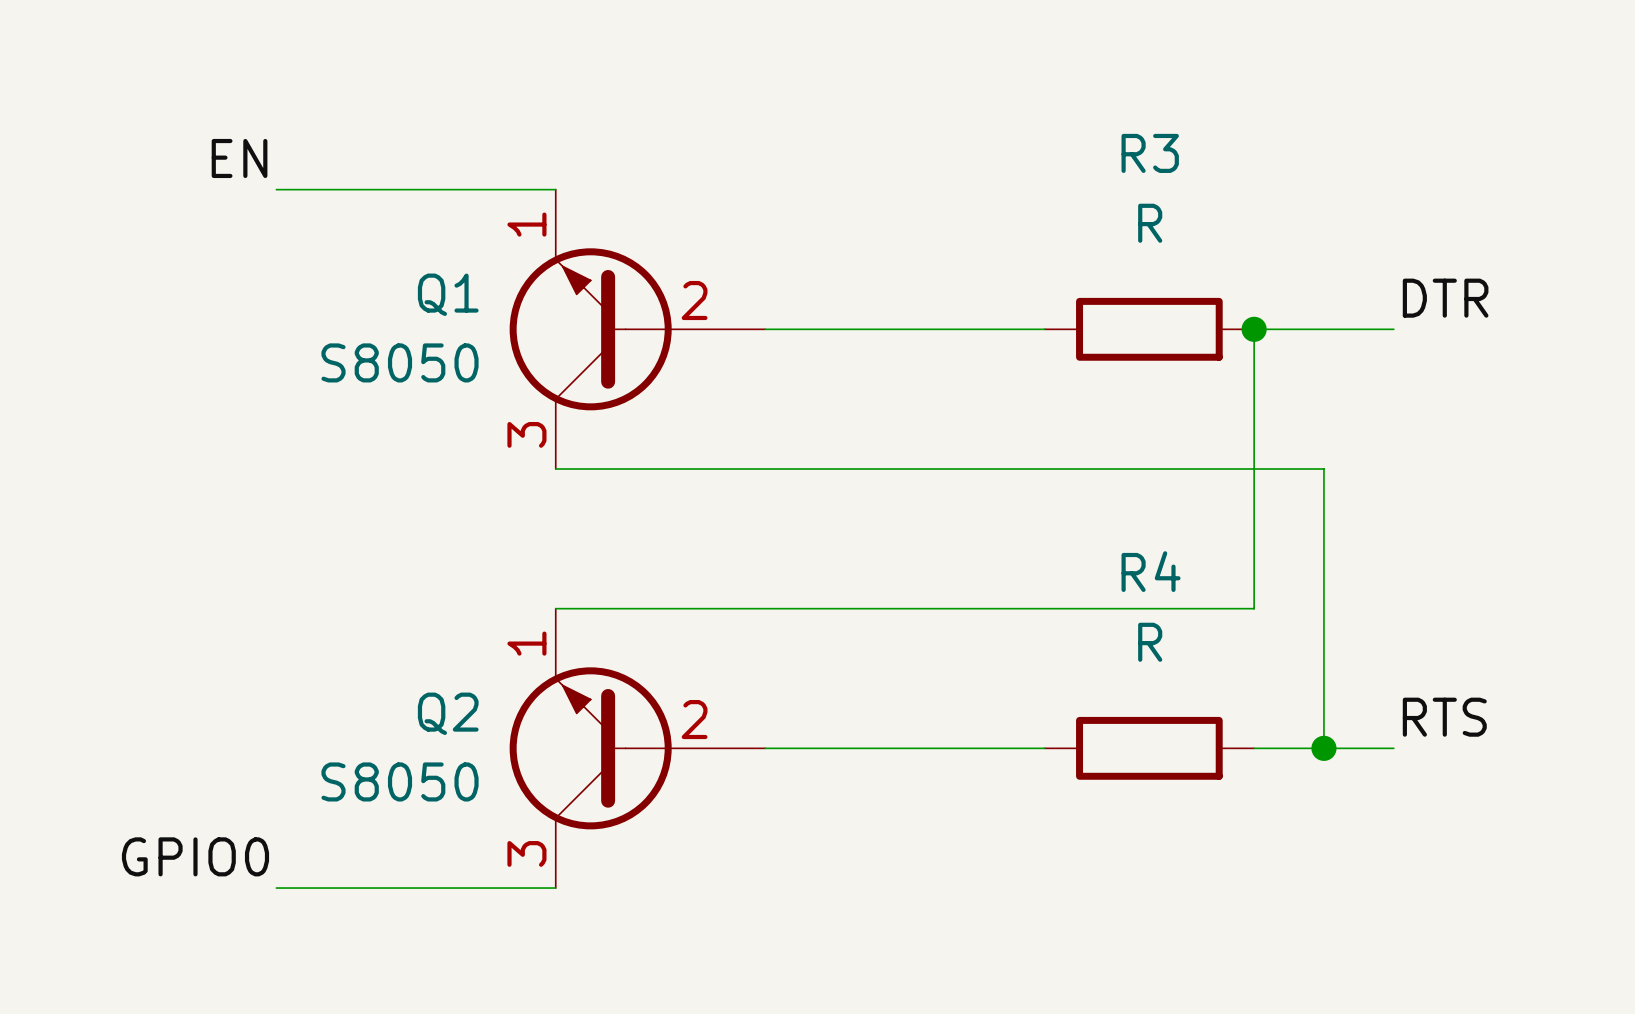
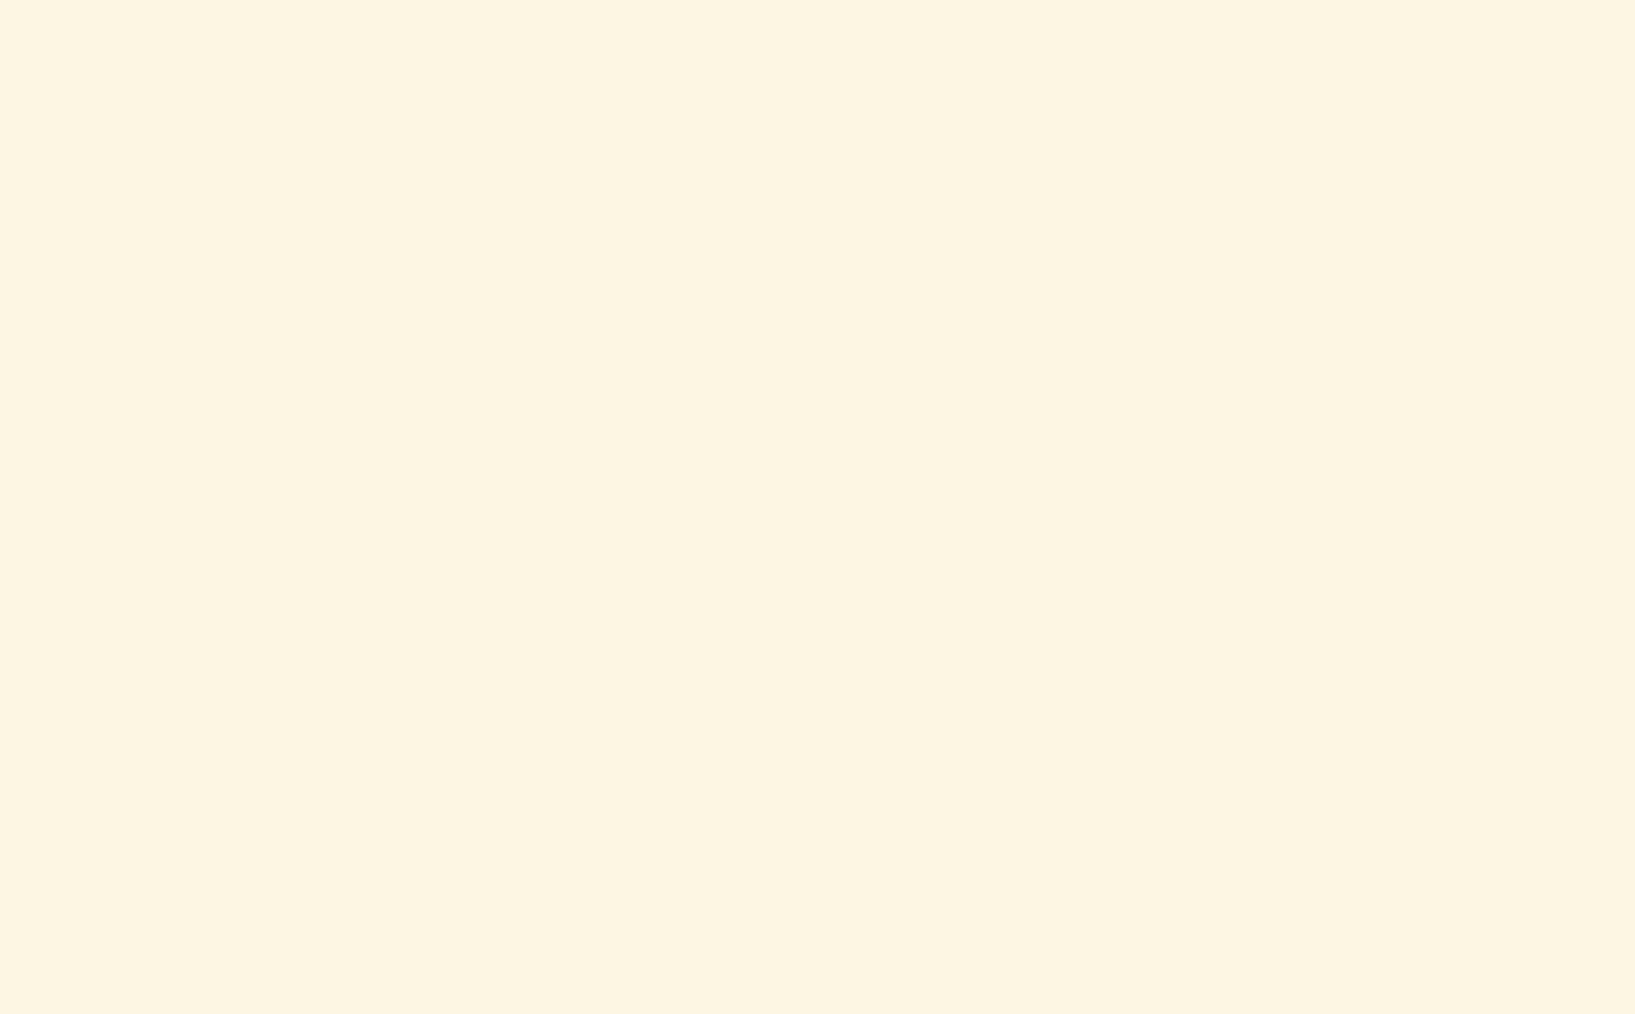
label: EN (239, 158) -> none
wire: (276, 189) (555, 189) -> none
label: DTR (1445, 298) -> none
Q1: S8050 (637, 329) -> none
wire: (765, 329) (1044, 329) -> none
R3: R (1149, 329) -> none
junction: (1254, 329) -> none
wire: (1393, 329) (1254, 329) (1254, 608) (555, 608) -> none
wire: (555, 469) (1323, 469) (1323, 748) -> none
label: RTS (1444, 717) -> none
Q2: S8050 (637, 748) -> none
wire: (765, 748) (1044, 748) -> none
R4: R (1149, 748) -> none
wire: (1254, 748) (1393, 748) -> none
junction: (1323, 748) -> none
label: GPIO0 (195, 856) -> none
wire: (276, 888) (555, 888) -> none

